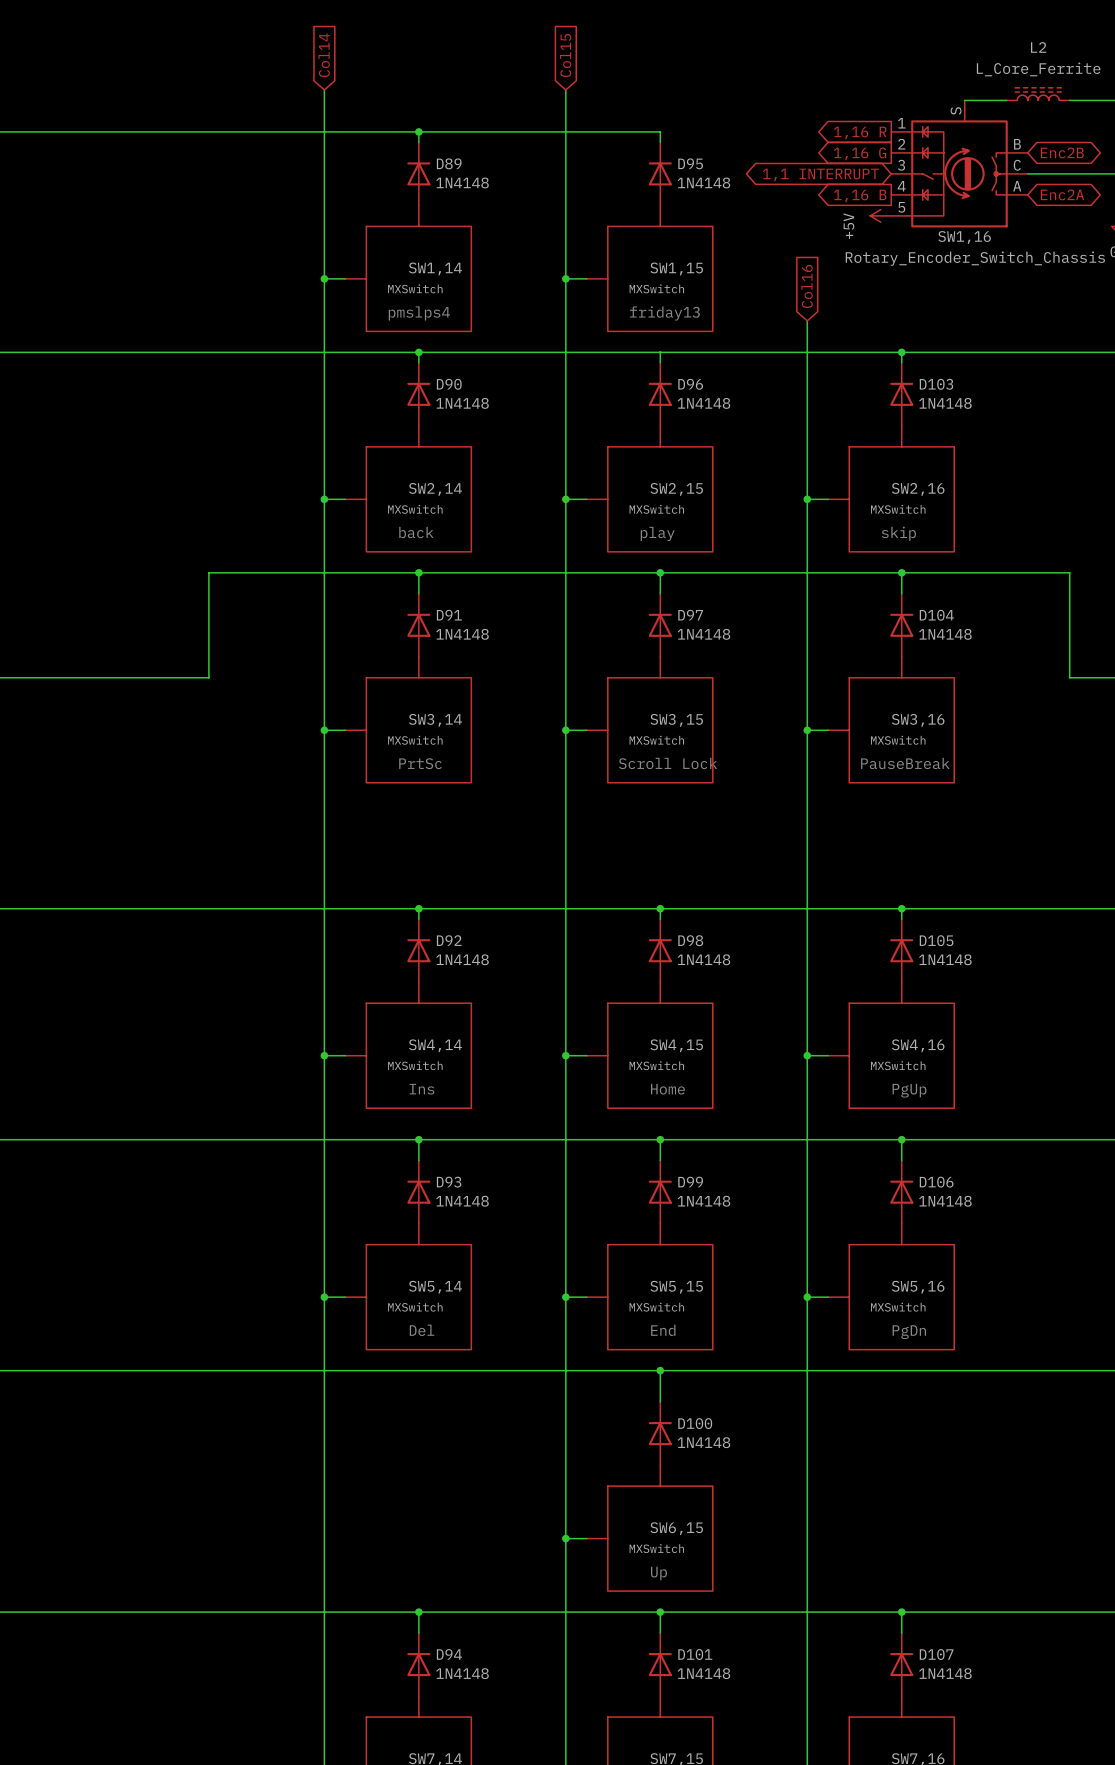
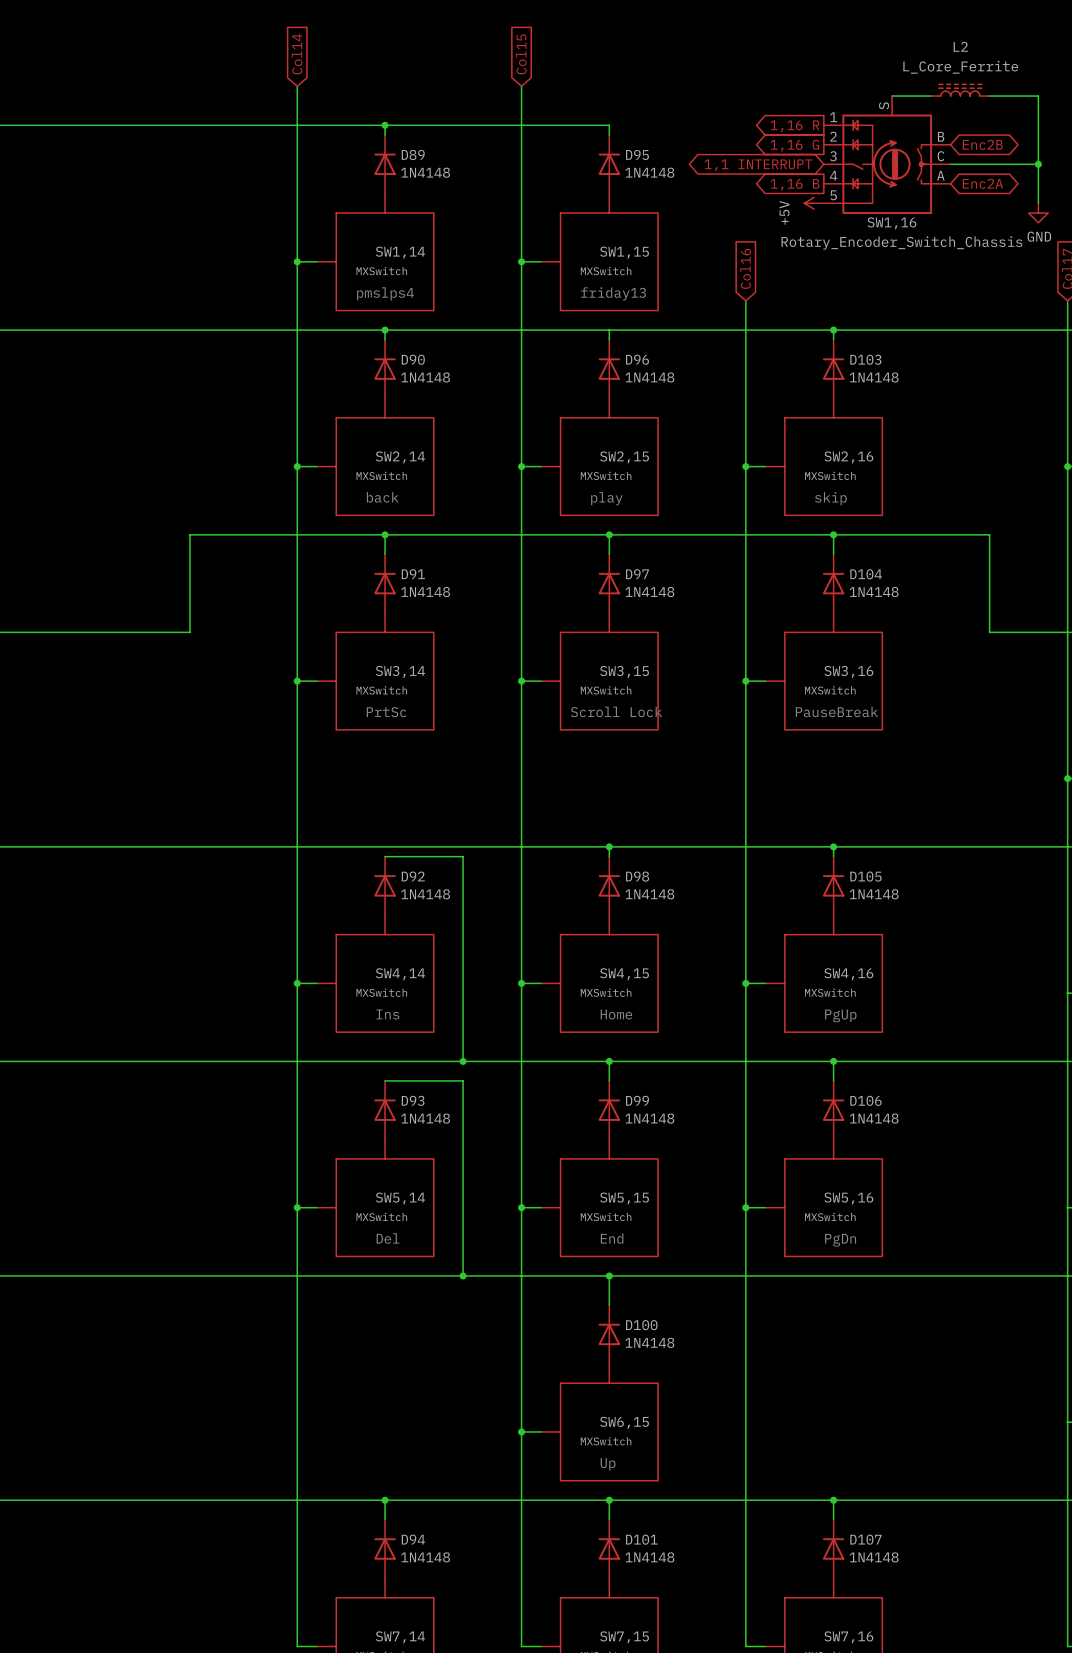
wire: (418, 908) (418, 919) -> (463, 1061) (463, 856) (385, 856)
junction: (418, 908) -> none
wire: (418, 1139) (418, 1160) -> (463, 1275) (463, 1080) (385, 1080)
junction: (418, 1139) -> none
junction: none -> (463, 1061)
junction: none -> (463, 1275)

